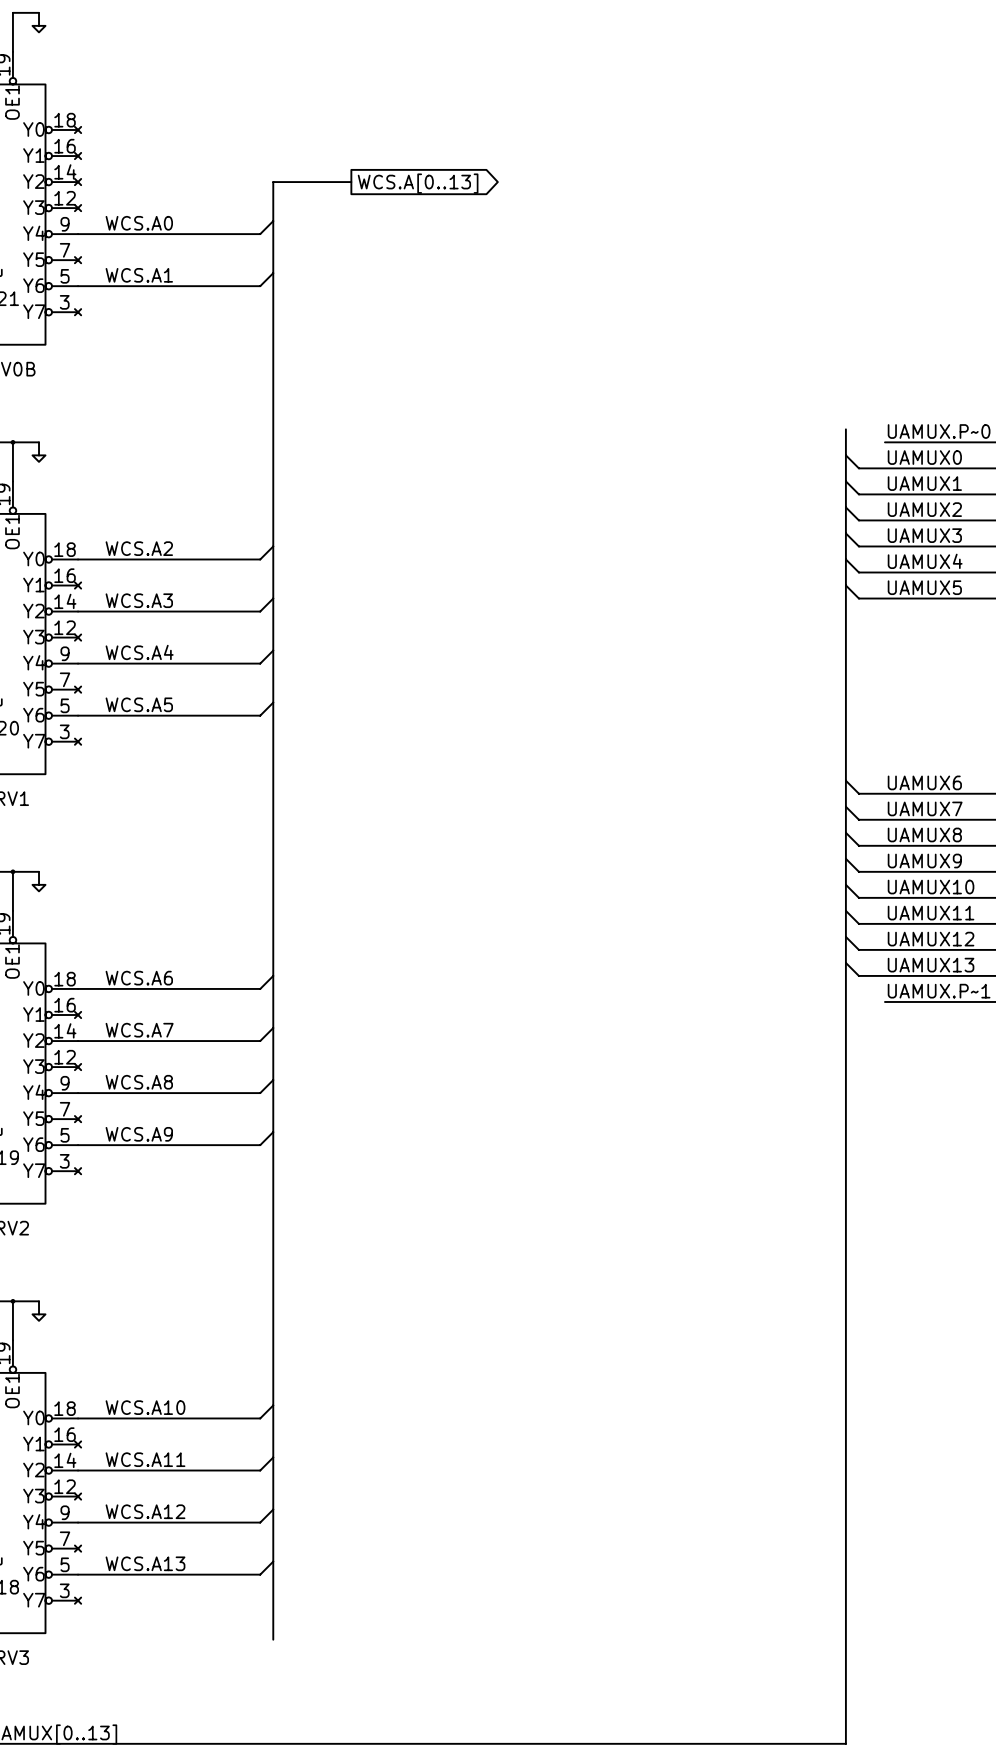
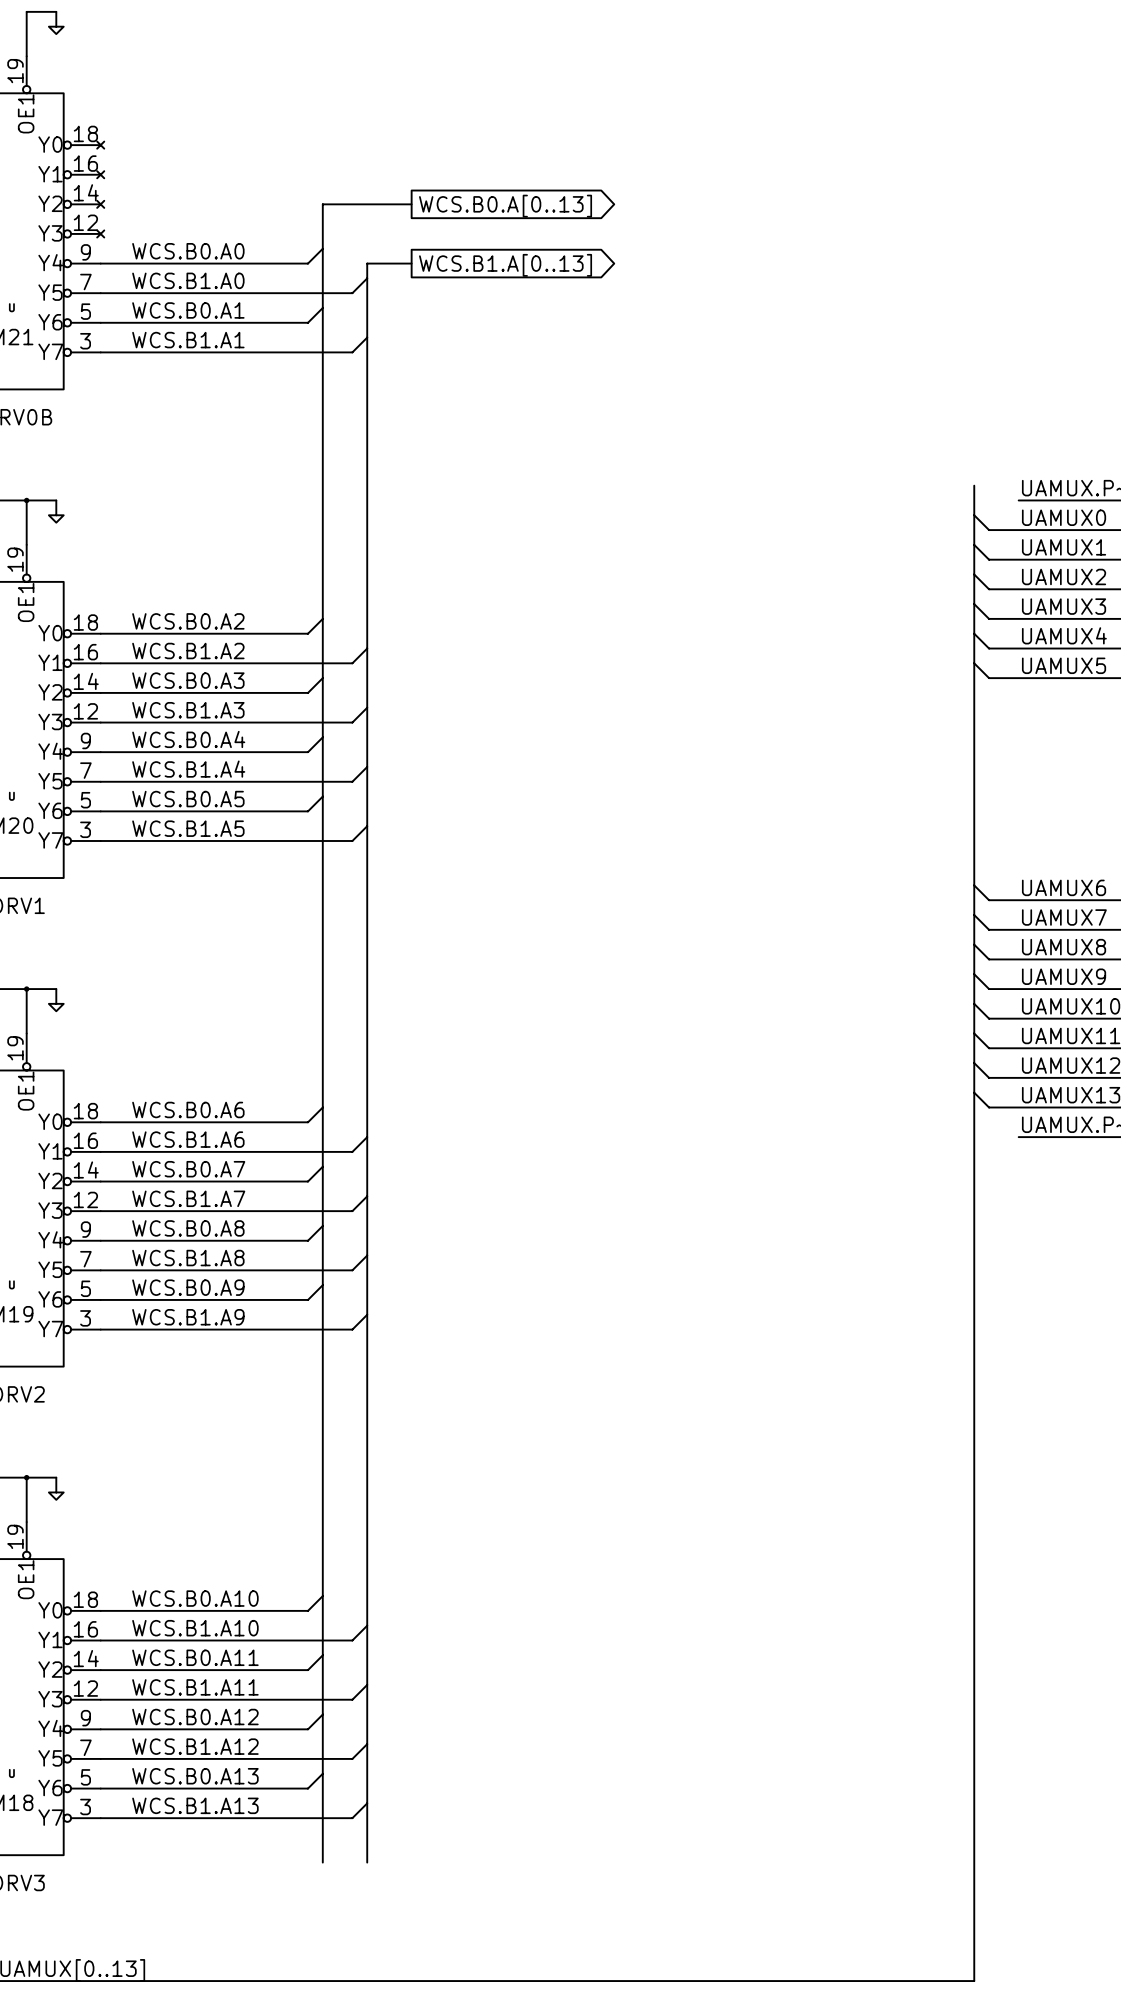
global label: WCS.A[0..13] (418, 183) -> WCS.B0.A[0..13] (505, 206)
label: WCS.A0 (139, 223) -> WCS.B0.A0 (188, 251)
bus: none -> (411, 263) (367, 263) (367, 1862)
global label: none -> WCS.B1.A[0..13] (505, 265)
wire: none -> (367, 278) (352, 293) (100, 293)
label: none -> WCS.B1.A0 (188, 280)
no-connect mark: (78, 260) -> none
label: WCS.A1 (139, 275) -> WCS.B0.A1 (188, 310)
wire: none -> (367, 337) (352, 352) (100, 352)
label: none -> WCS.B1.A1 (188, 340)
no-connect mark: (78, 312) -> none
label: WCS.A2 (139, 548) -> WCS.B0.A2 (188, 621)
wire: none -> (367, 648) (352, 663) (100, 663)
label: none -> WCS.B1.A2 (188, 651)
no-connect mark: (78, 585) -> none
label: WCS.A3 (139, 600) -> WCS.B0.A3 (188, 680)
wire: none -> (367, 707) (352, 722) (100, 722)
label: none -> WCS.B1.A3 (188, 710)
no-connect mark: (78, 637) -> none
label: WCS.A4 (139, 652) -> WCS.B0.A4 (188, 739)
wire: none -> (367, 766) (352, 781) (100, 781)
label: none -> WCS.B1.A4 (188, 769)
no-connect mark: (78, 689) -> none
label: WCS.A5 (139, 704) -> WCS.B0.A5 (188, 799)
wire: none -> (367, 826) (352, 840) (100, 840)
label: none -> WCS.B1.A5 (188, 828)
no-connect mark: (78, 741) -> none
label: WCS.A6 (139, 978) -> WCS.B0.A6 (188, 1109)
wire: none -> (367, 1137) (352, 1151) (100, 1151)
label: none -> WCS.B1.A6 (188, 1139)
no-connect mark: (78, 1015) -> none
label: WCS.A7 (139, 1030) -> WCS.B0.A7 (188, 1169)
wire: none -> (367, 1196) (352, 1211) (100, 1211)
label: none -> WCS.B1.A7 (188, 1198)
no-connect mark: (78, 1067) -> none
label: WCS.A8 (139, 1082) -> WCS.B0.A8 (188, 1228)
wire: none -> (367, 1255) (352, 1270) (100, 1270)
label: none -> WCS.B1.A8 (188, 1258)
no-connect mark: (78, 1119) -> none
label: WCS.A9 (139, 1134) -> WCS.B0.A9 (188, 1287)
wire: none -> (367, 1314) (352, 1329) (100, 1329)
label: none -> WCS.B1.A9 (188, 1317)
no-connect mark: (78, 1171) -> none
label: WCS.A10 (145, 1407) -> WCS.B0.A10 (195, 1598)
wire: none -> (367, 1625) (352, 1640) (100, 1640)
label: none -> WCS.B1.A10 (195, 1628)
no-connect mark: (78, 1444) -> none
label: WCS.A11 (145, 1459) -> WCS.B0.A11 (195, 1657)
wire: none -> (367, 1684) (352, 1699) (100, 1699)
label: none -> WCS.B1.A11 (195, 1687)
no-connect mark: (78, 1496) -> none
label: WCS.A12 (145, 1511) -> WCS.B0.A12 (195, 1717)
wire: none -> (367, 1744) (352, 1758) (100, 1758)
label: none -> WCS.B1.A12 (195, 1746)
no-connect mark: (78, 1548) -> none
label: WCS.A13 (145, 1563) -> WCS.B0.A13 (195, 1776)
wire: none -> (367, 1803) (352, 1818) (100, 1818)
label: none -> WCS.B1.A13 (195, 1805)
no-connect mark: (78, 1600) -> none

